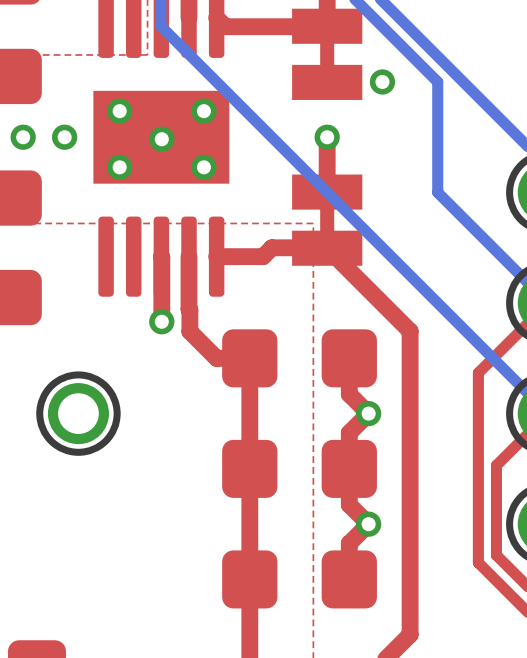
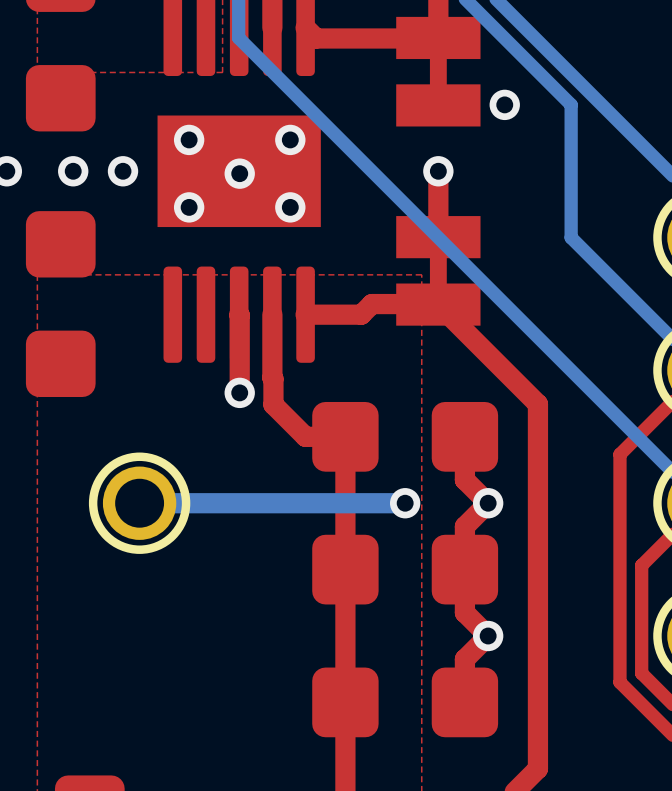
bottom track: none -> (405, 503) (139, 503)
via: none -> (405, 503)

